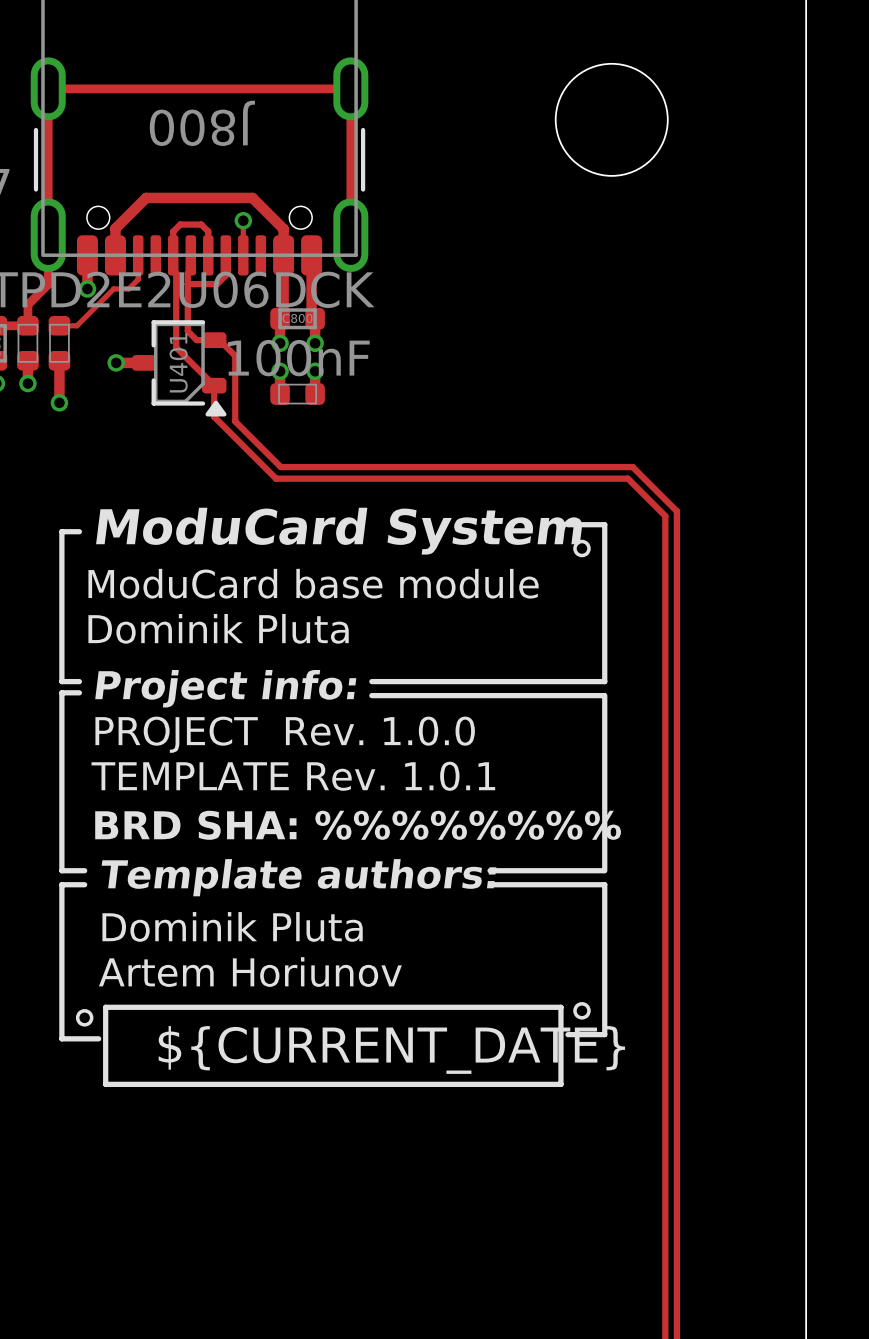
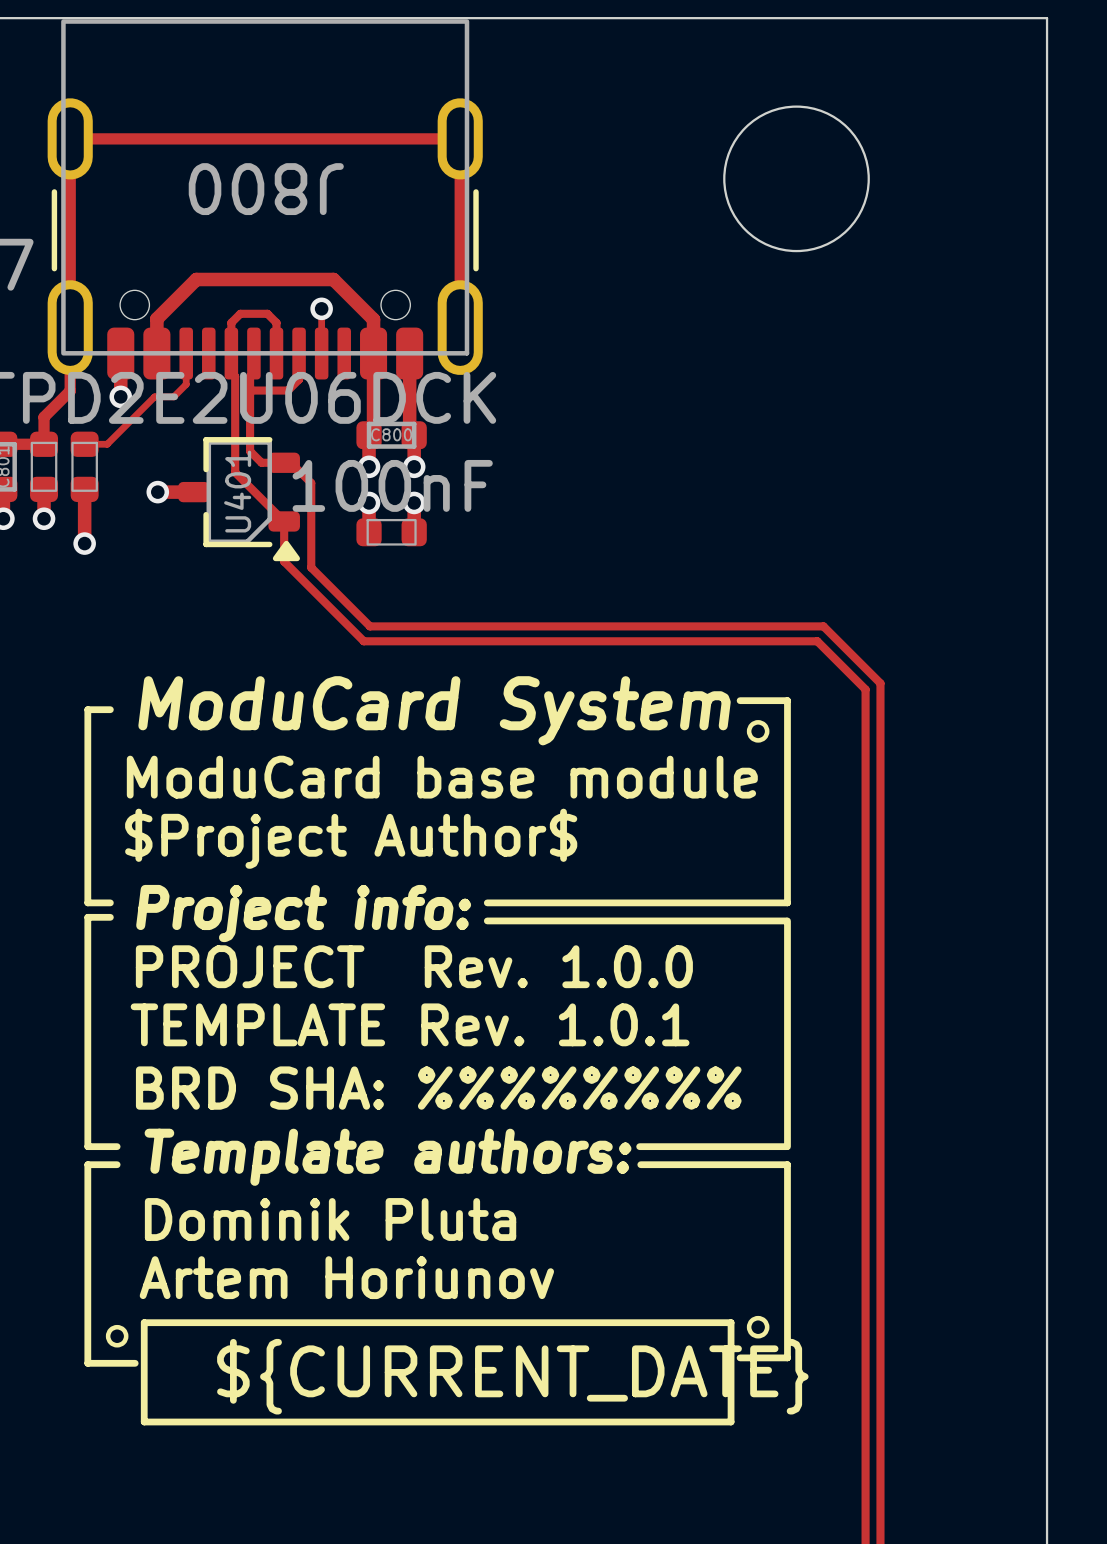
text: Dominik Pluta (218, 628) -> $Project Author$ (351, 838)

